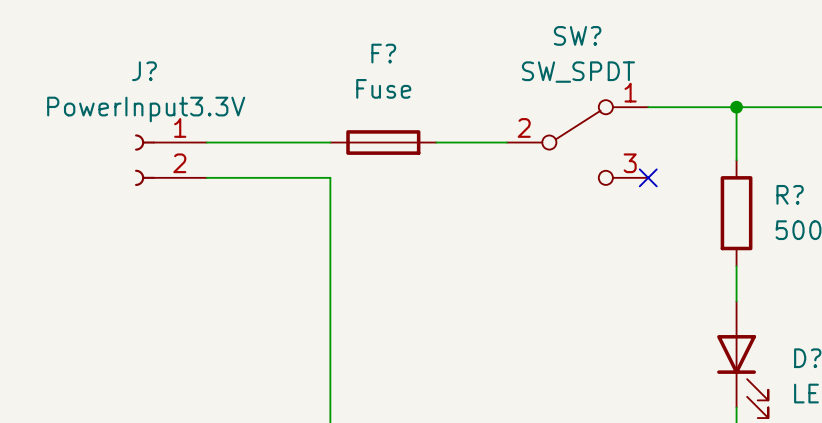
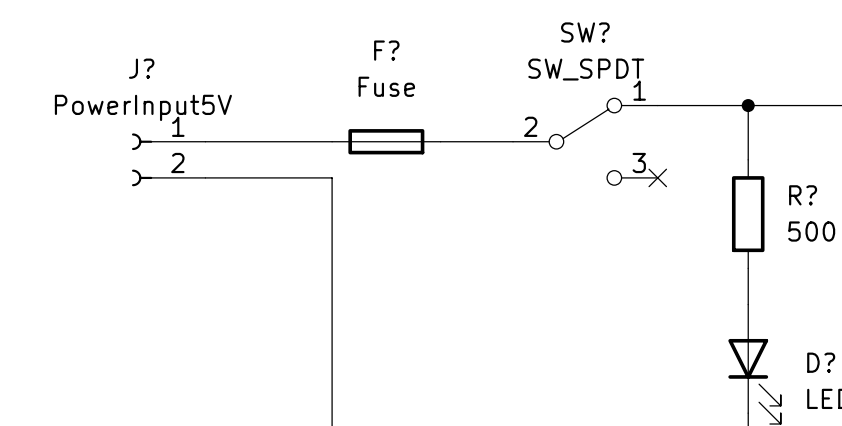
J? value: PowerInput3.3V (146, 109) -> PowerInput5V (143, 107)

